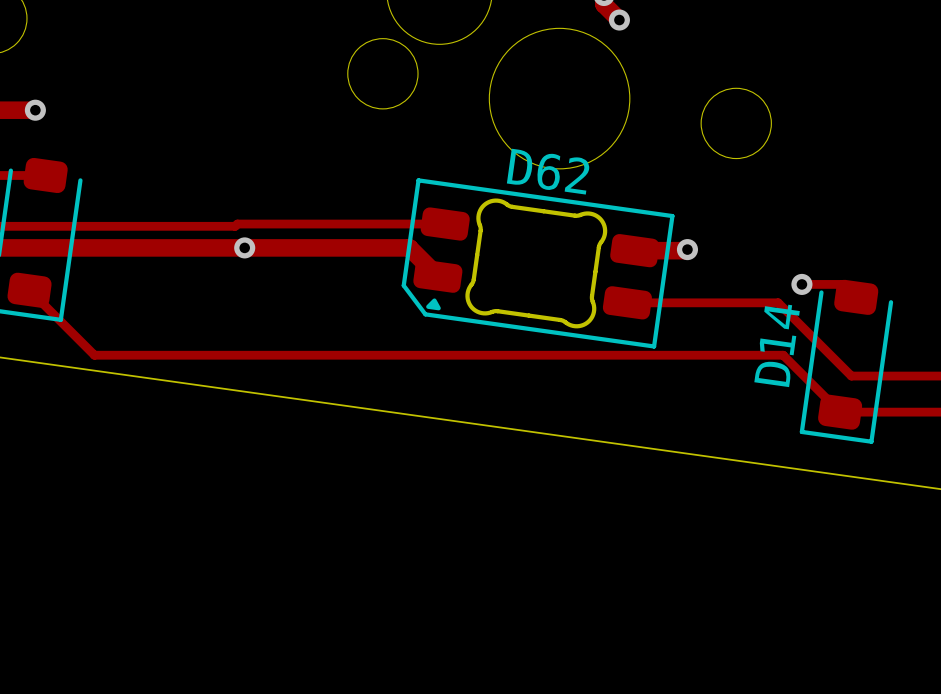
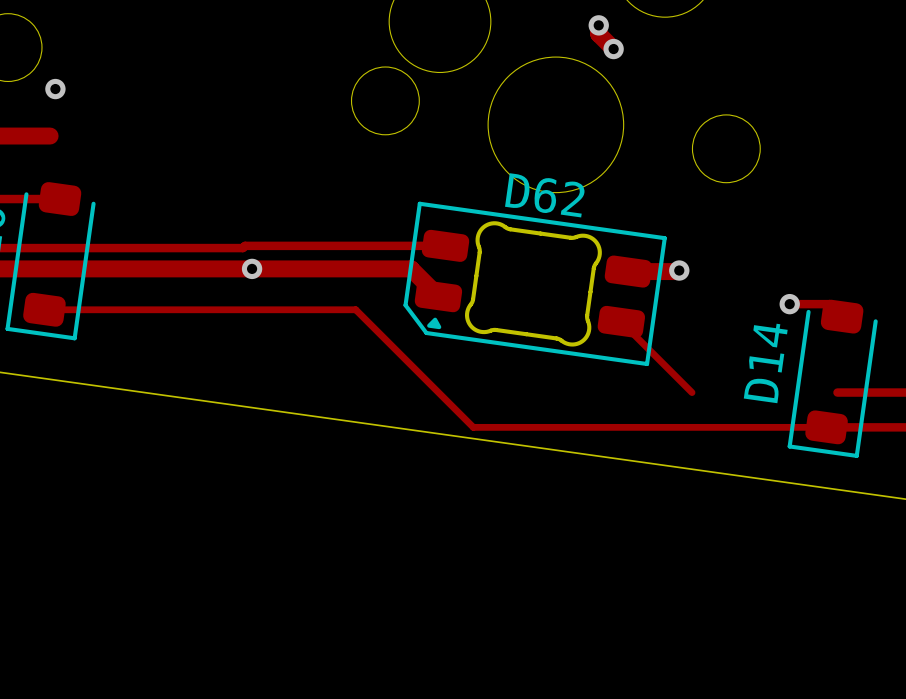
via position: (35, 110) -> (55, 89)
track: (29, 290) (94, 355) (783, 355) (840, 412) -> (44, 309) (355, 309) (473, 427) (826, 427)
track: (627, 302) (778, 302) (851, 376) -> (621, 321) (692, 392)

